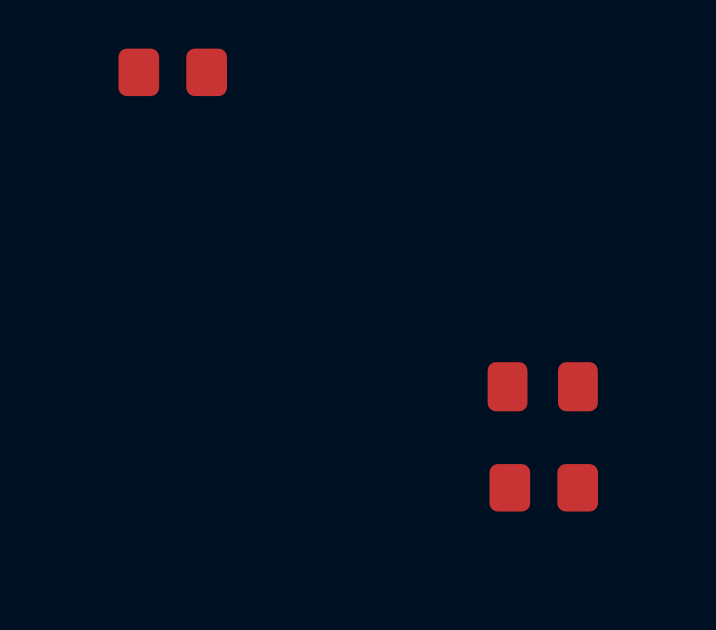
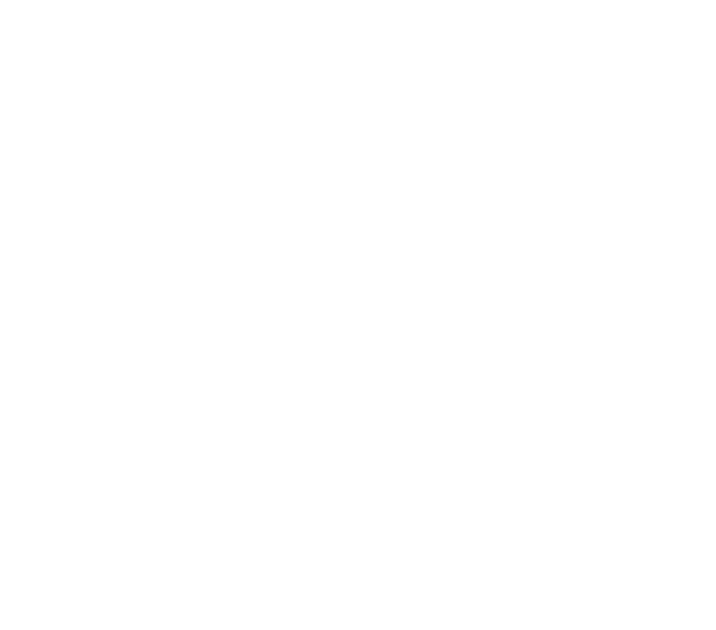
part: (172, 72) -> none
part: (542, 386) -> none
part: (543, 487) -> none

